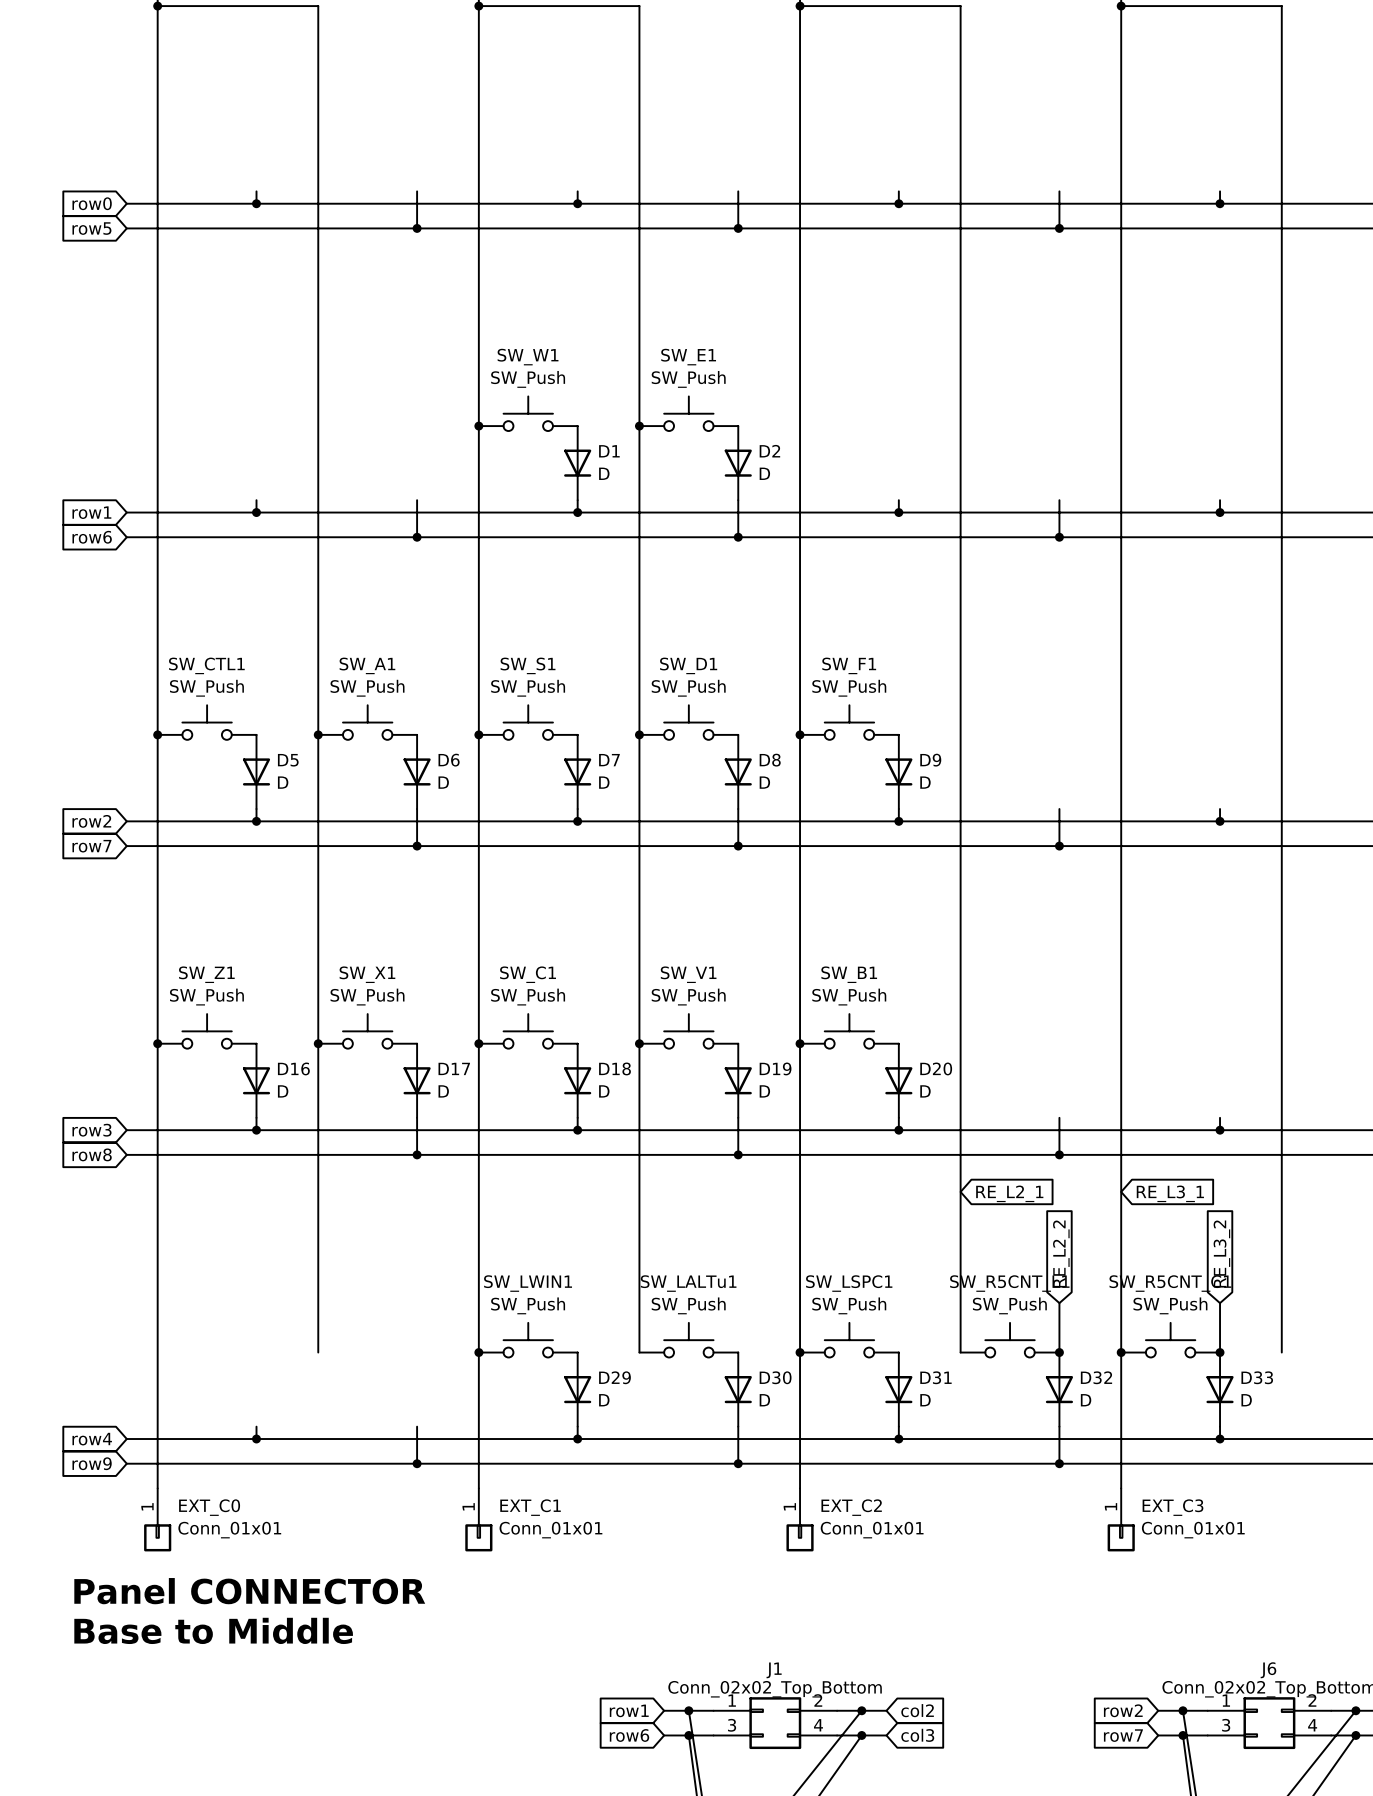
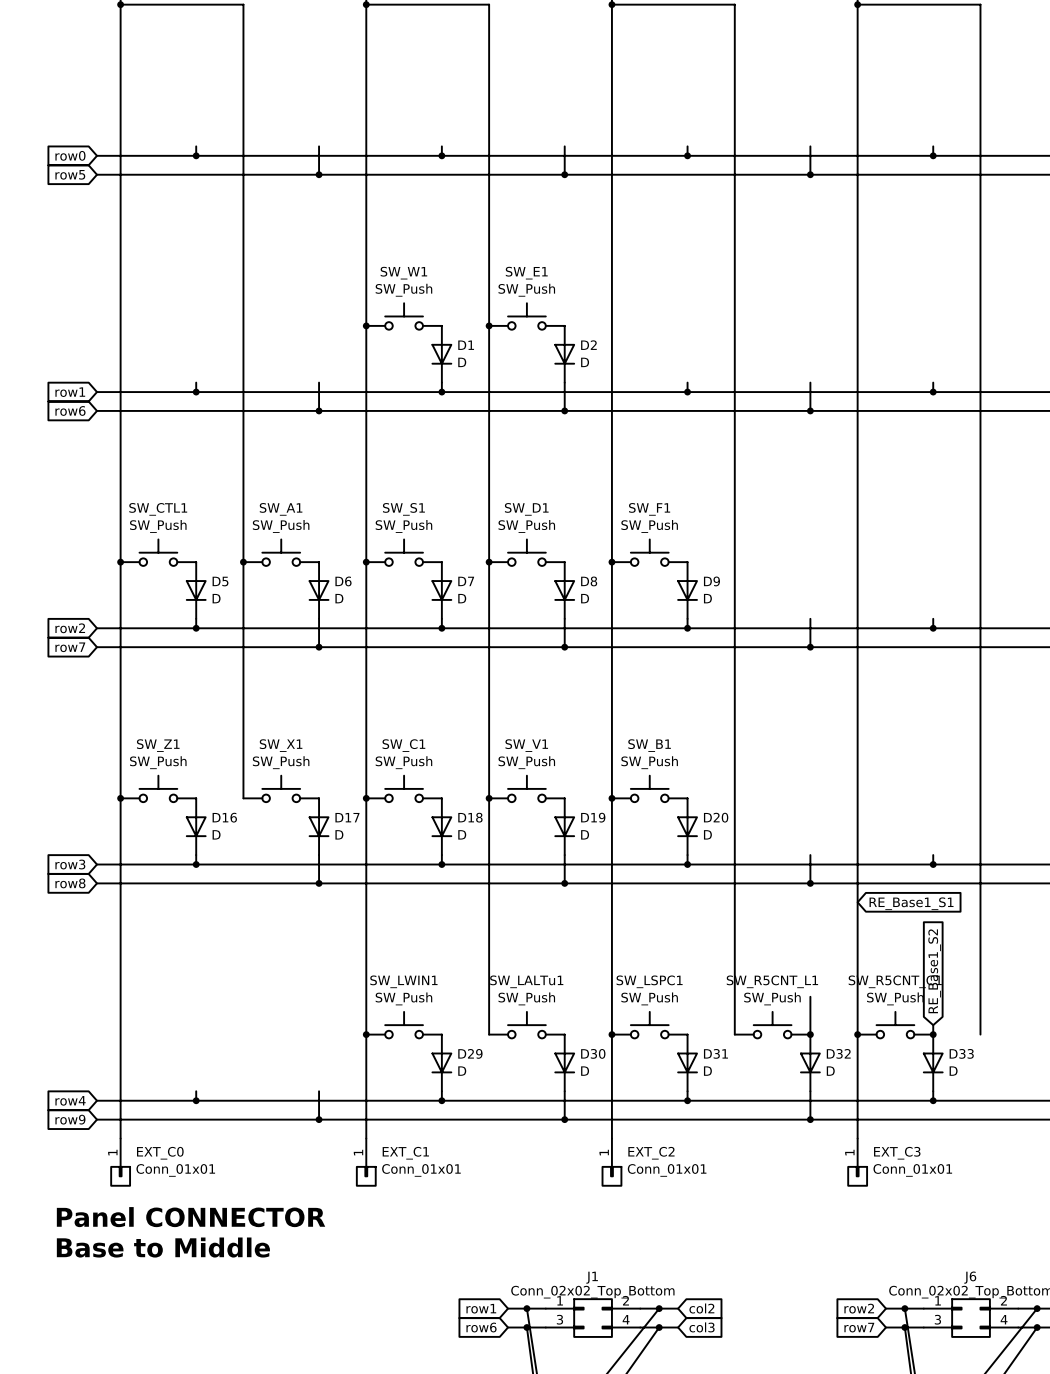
wire: (318, 1043) (318, 1352) -> none
junction: (318, 1043) -> none
global label: none -> RE_Base1_S1 (911, 903)
global label: RE_L2_1 (1009, 1193) -> none
global label: RE_L3_1 (1170, 1193) -> none
global label: RE_L2_2 (1061, 1254) -> none
global label: RE_L3_2 (1221, 1254) -> none
global label: none -> RE_Base1_S2 (934, 971)
wire: (1220, 1303) (1220, 1340) -> none

